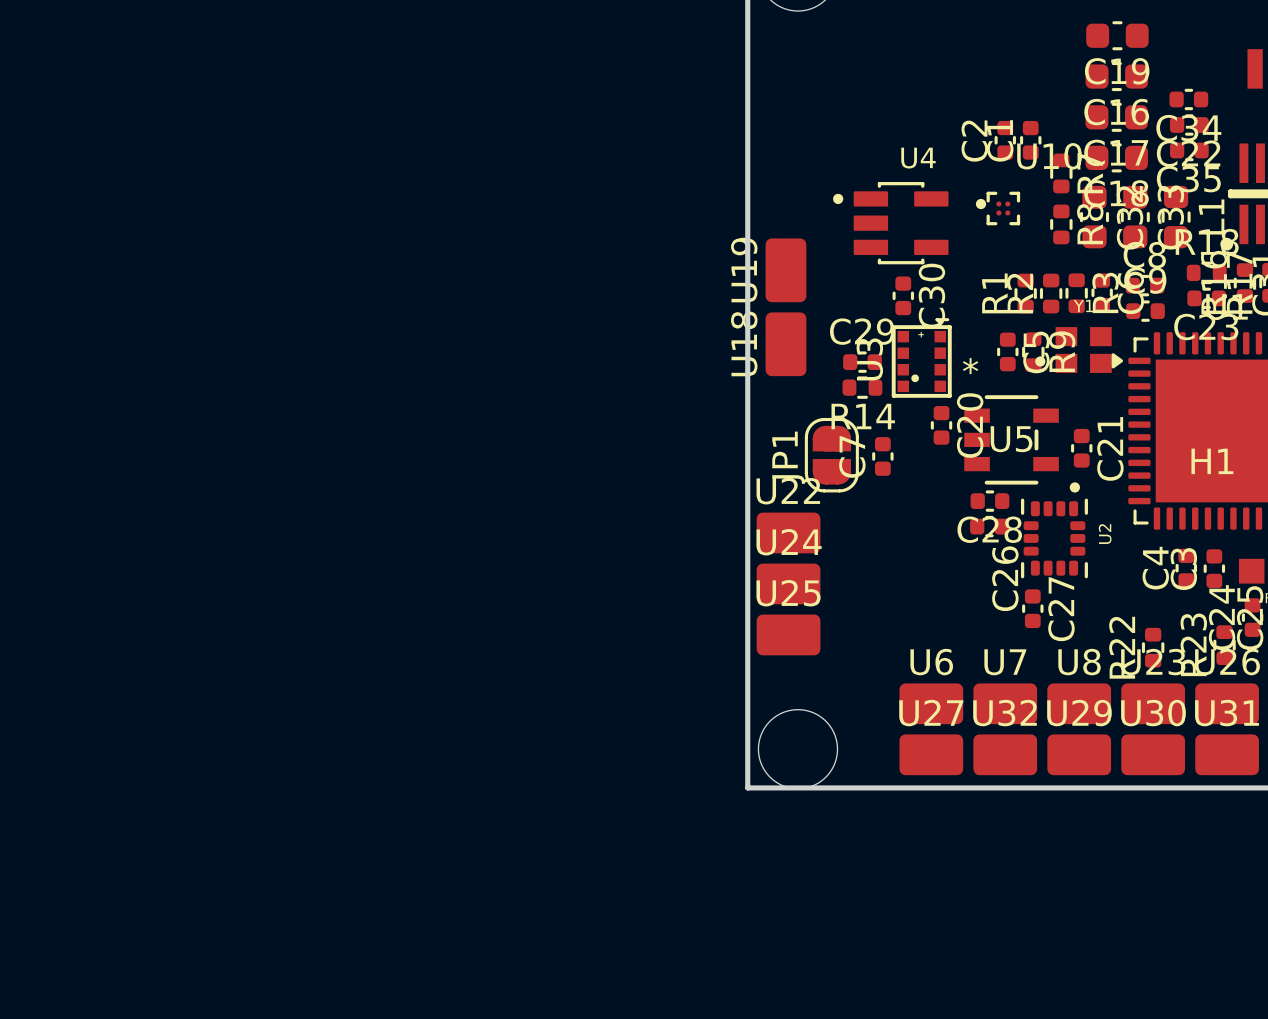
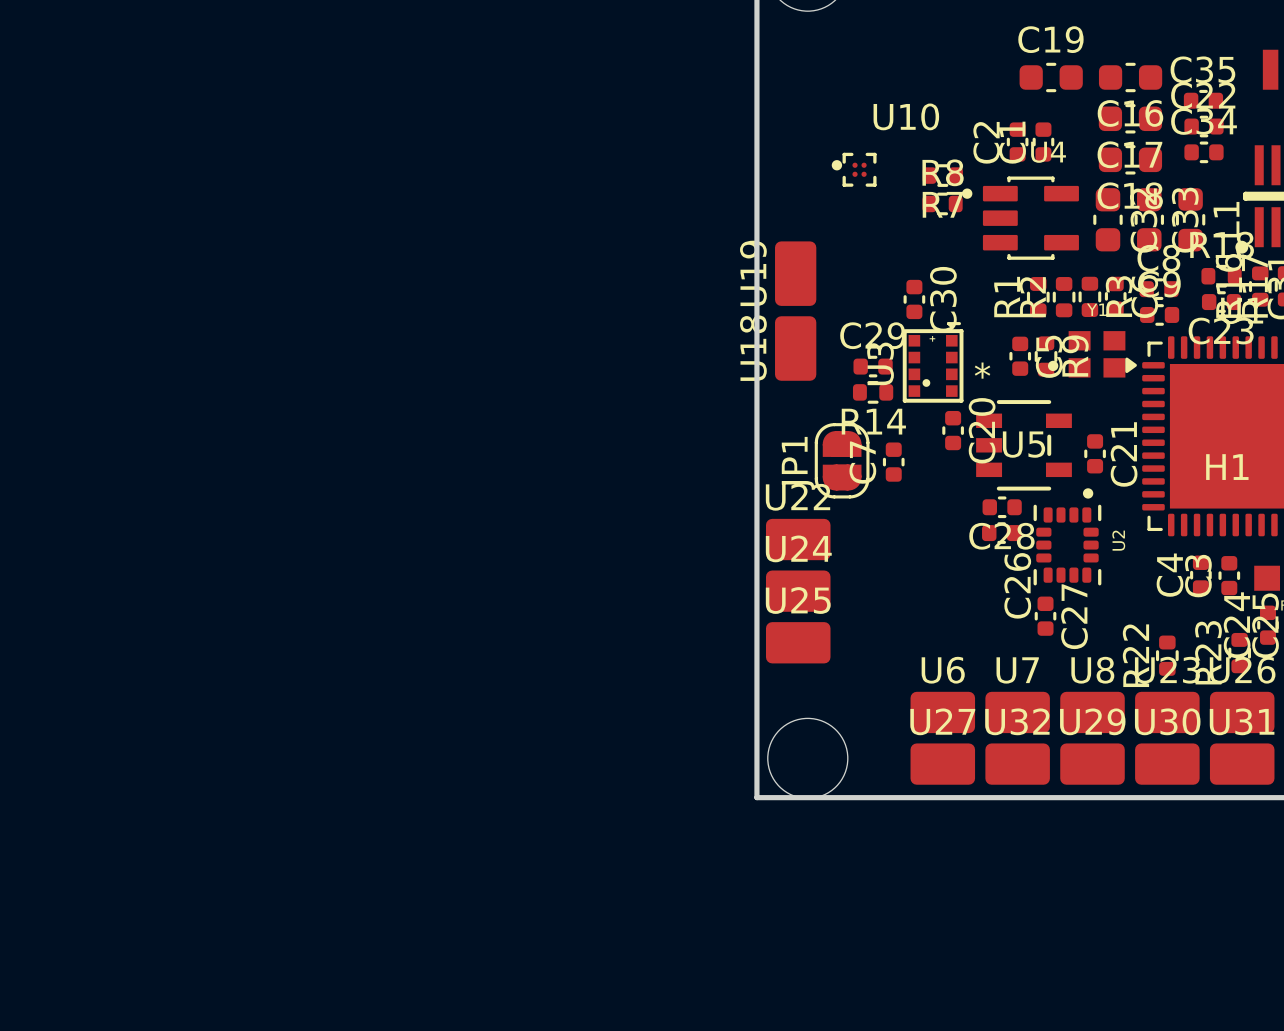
C19 position: (1117, 35) -> (1051, 77)
C19 name position: C19 (1117, 71) -> C19 (1050, 39)
C34 name: C34 (1188, 128) -> C35 (1202, 69)
C22 name position: C22 (1188, 153) -> C22 (1203, 95)
R7 rotation: 0° (1061, 173) -> 90° clockwise (942, 175)
R7 position: (1061, 173) -> (942, 175)
C35 name: C35 (1188, 179) -> C34 (1204, 121)
U10 position: (998, 208) -> (854, 169)
U4 position: (890, 223) -> (1020, 218)
R8 rotation: 0° (1061, 224) -> 90° clockwise (942, 203)
R8 position: (1061, 224) -> (942, 203)

